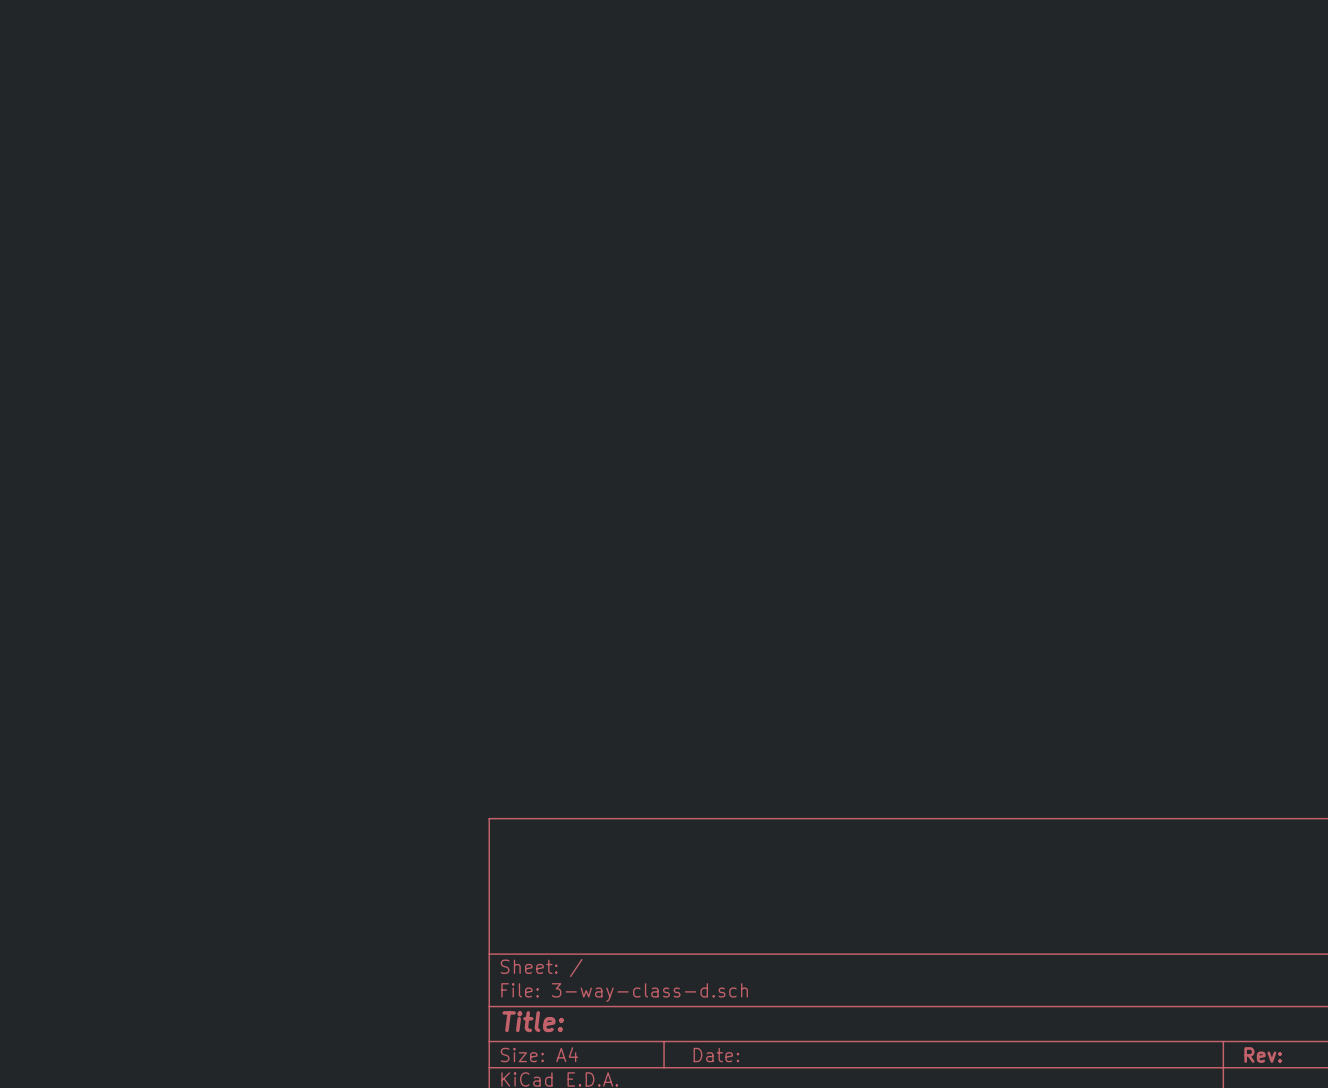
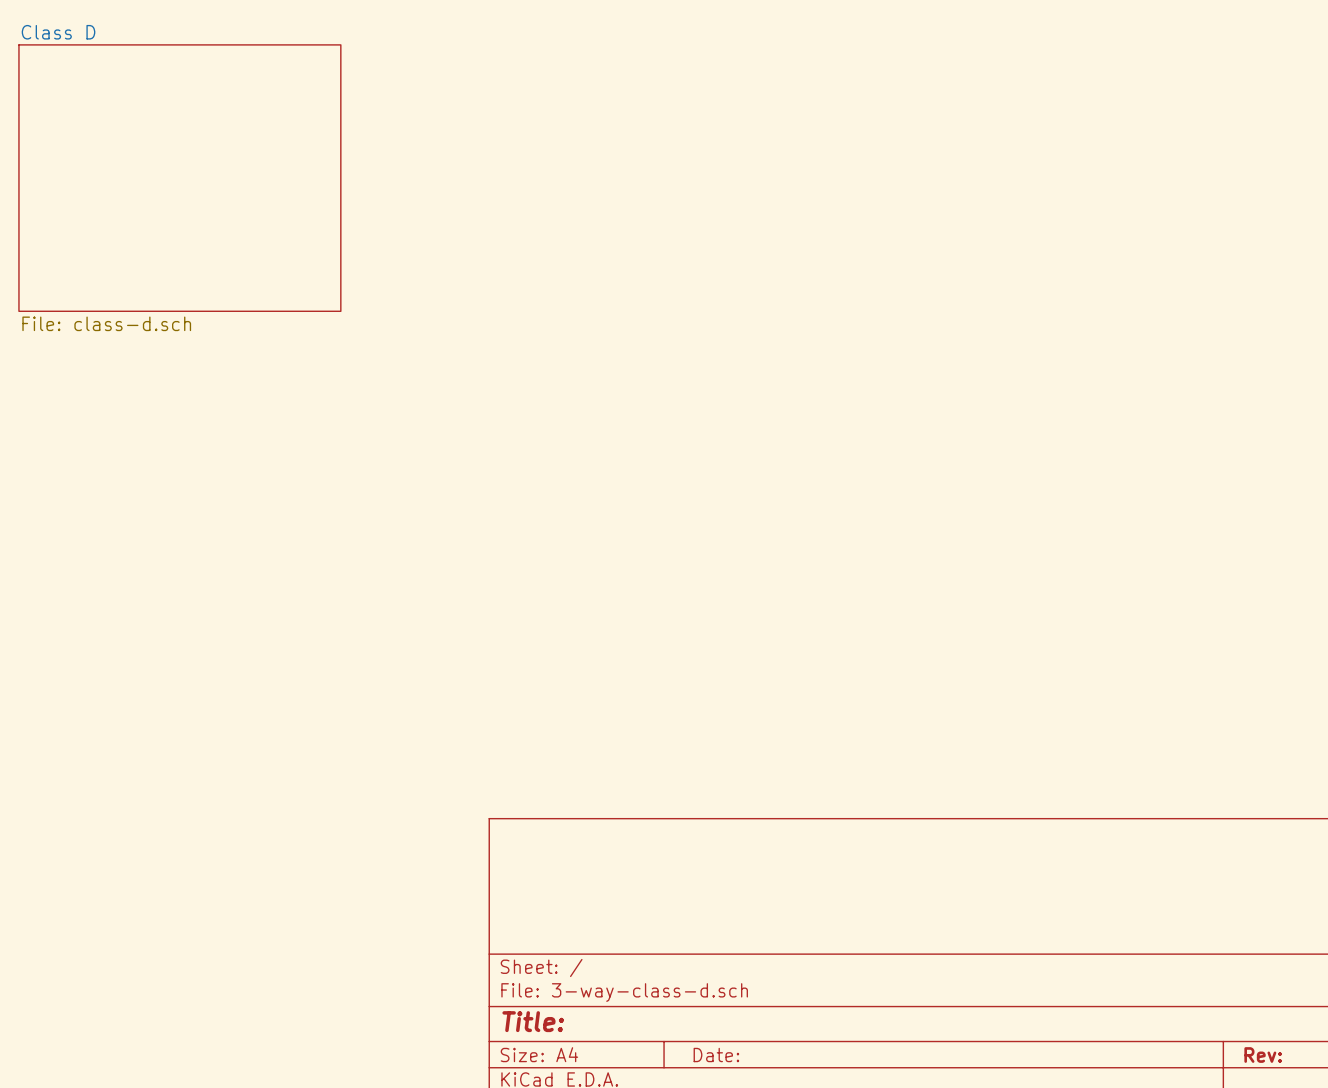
sheet Class D: none -> File: class-d.sch (179, 178)

